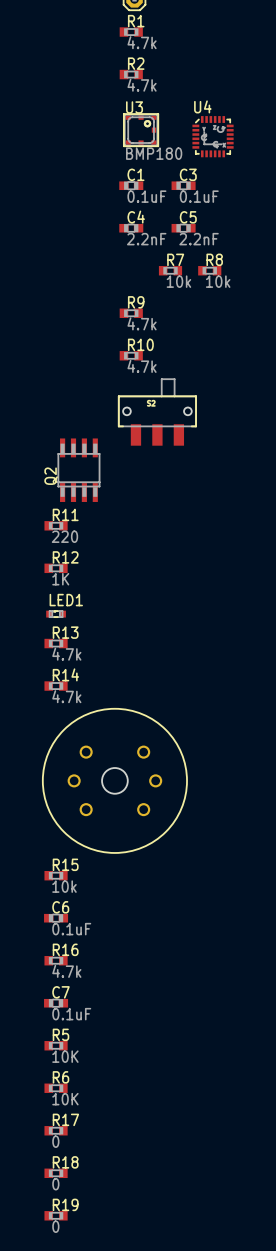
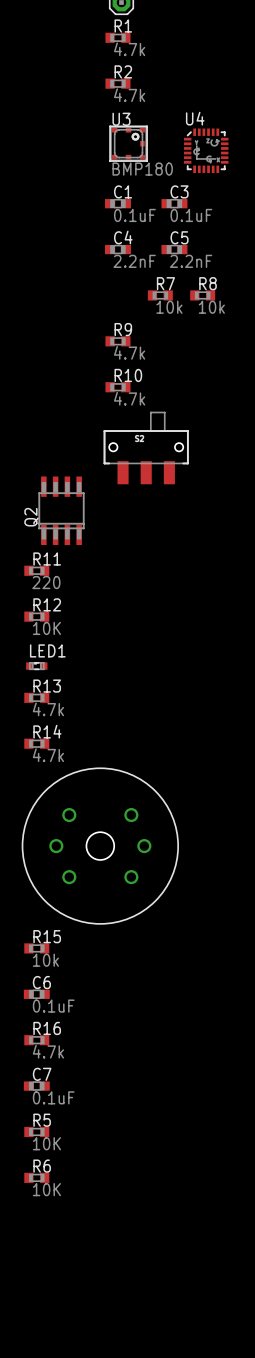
R12 value: 1K (60, 579) -> 10K (46, 628)
R17: 0 (56, 1130) -> none
R18: 0 (56, 1173) -> none
R19: 0 (56, 1215) -> none

